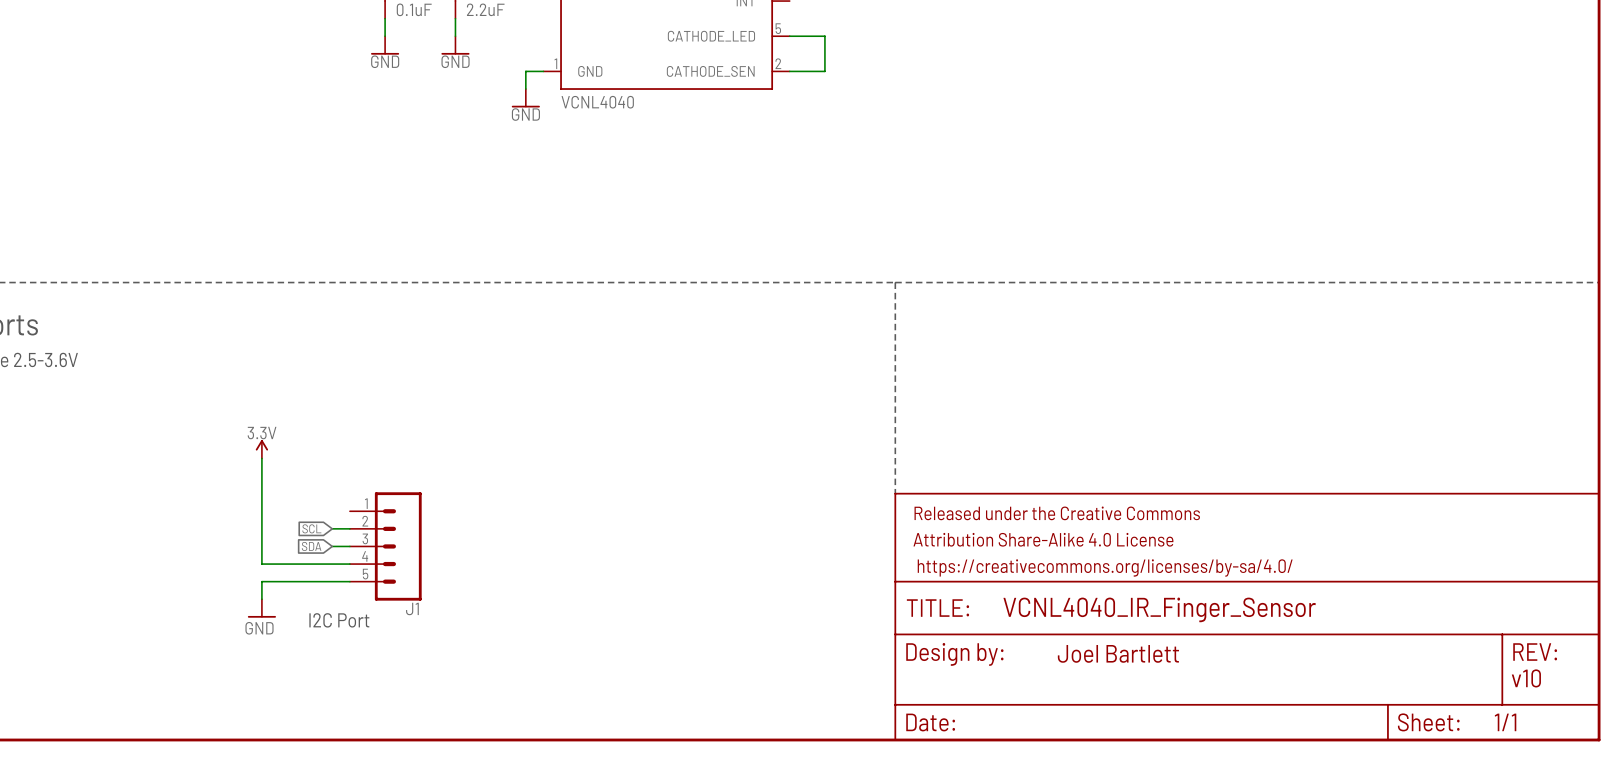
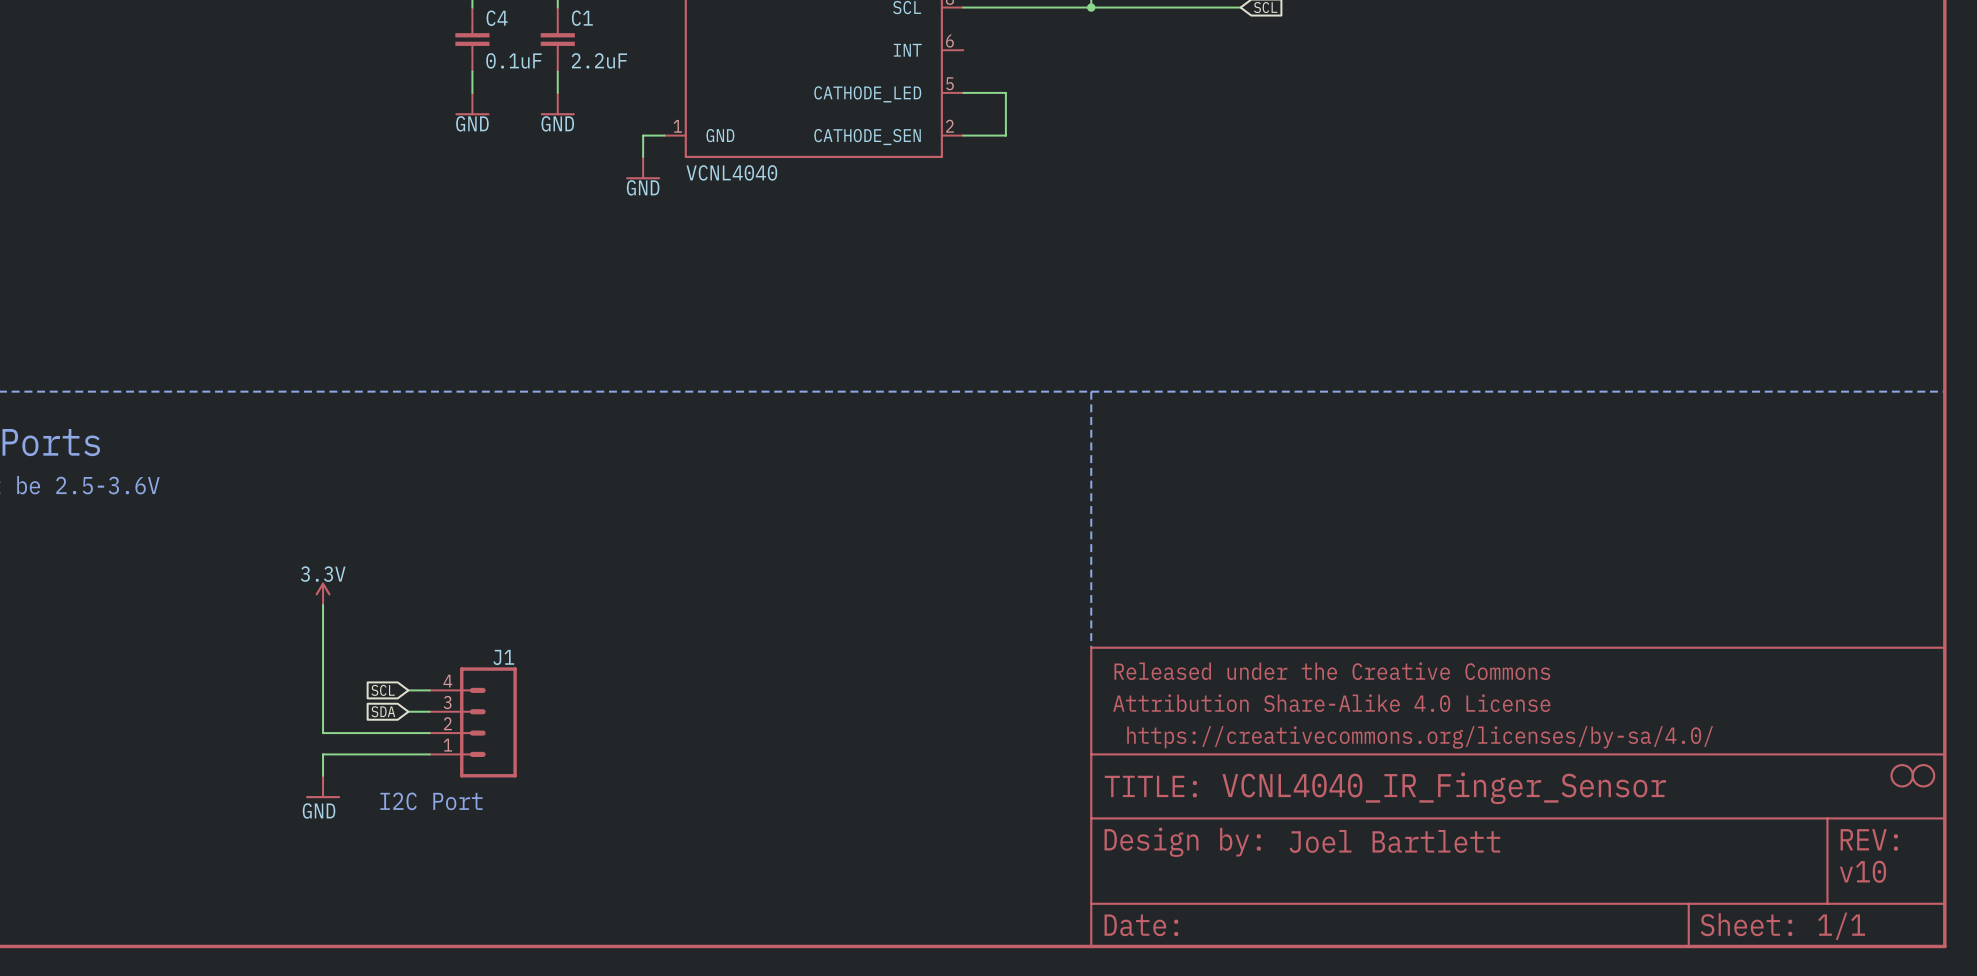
J1 symbol: [349, 492, 422, 601] -> [429, 667, 517, 778]
part: none -> (1902, 775)
part: none -> (1923, 775)
J1 name position: J1 (412, 608) -> J1 (503, 657)

